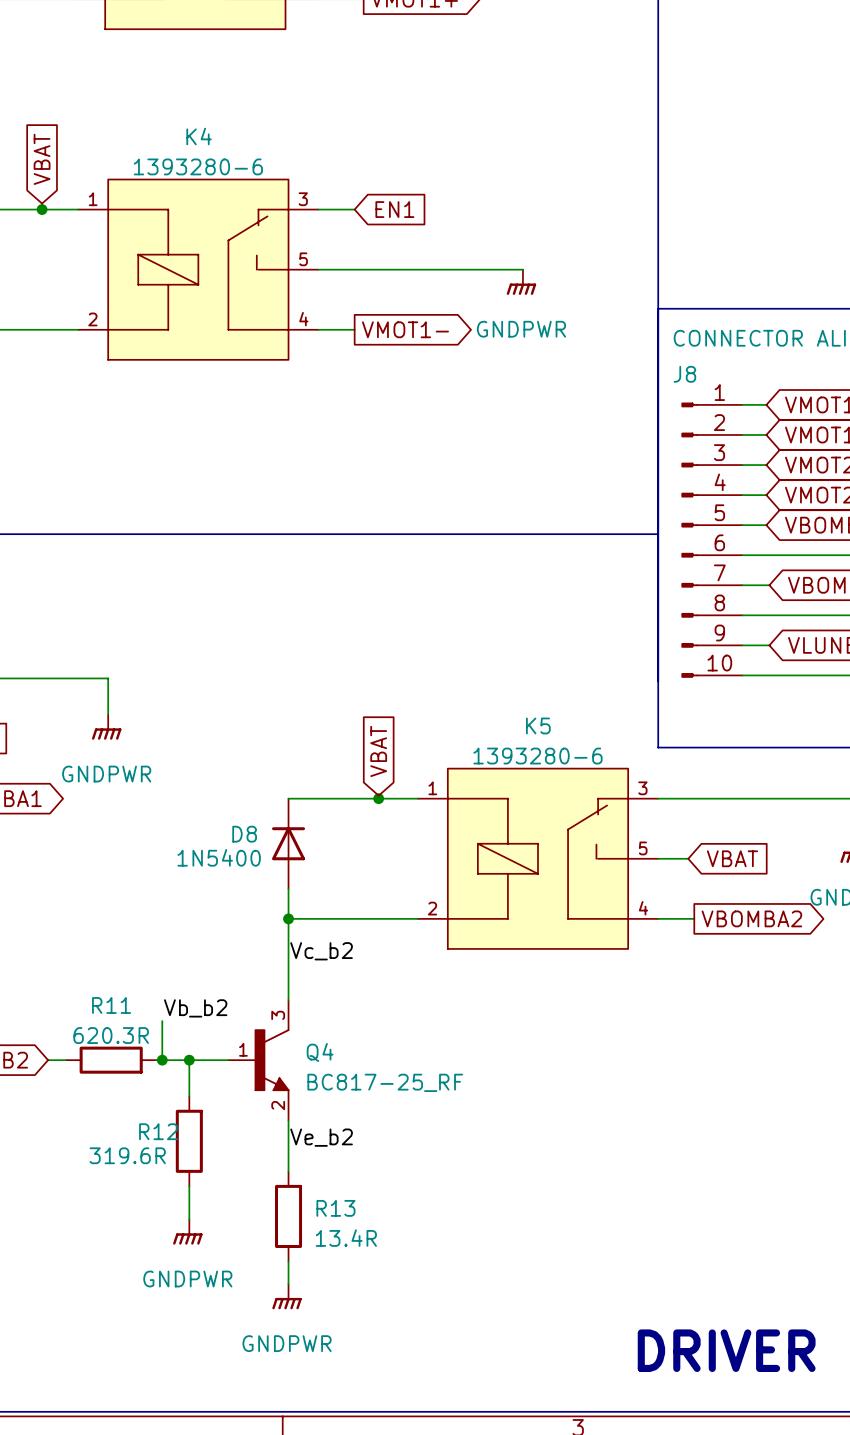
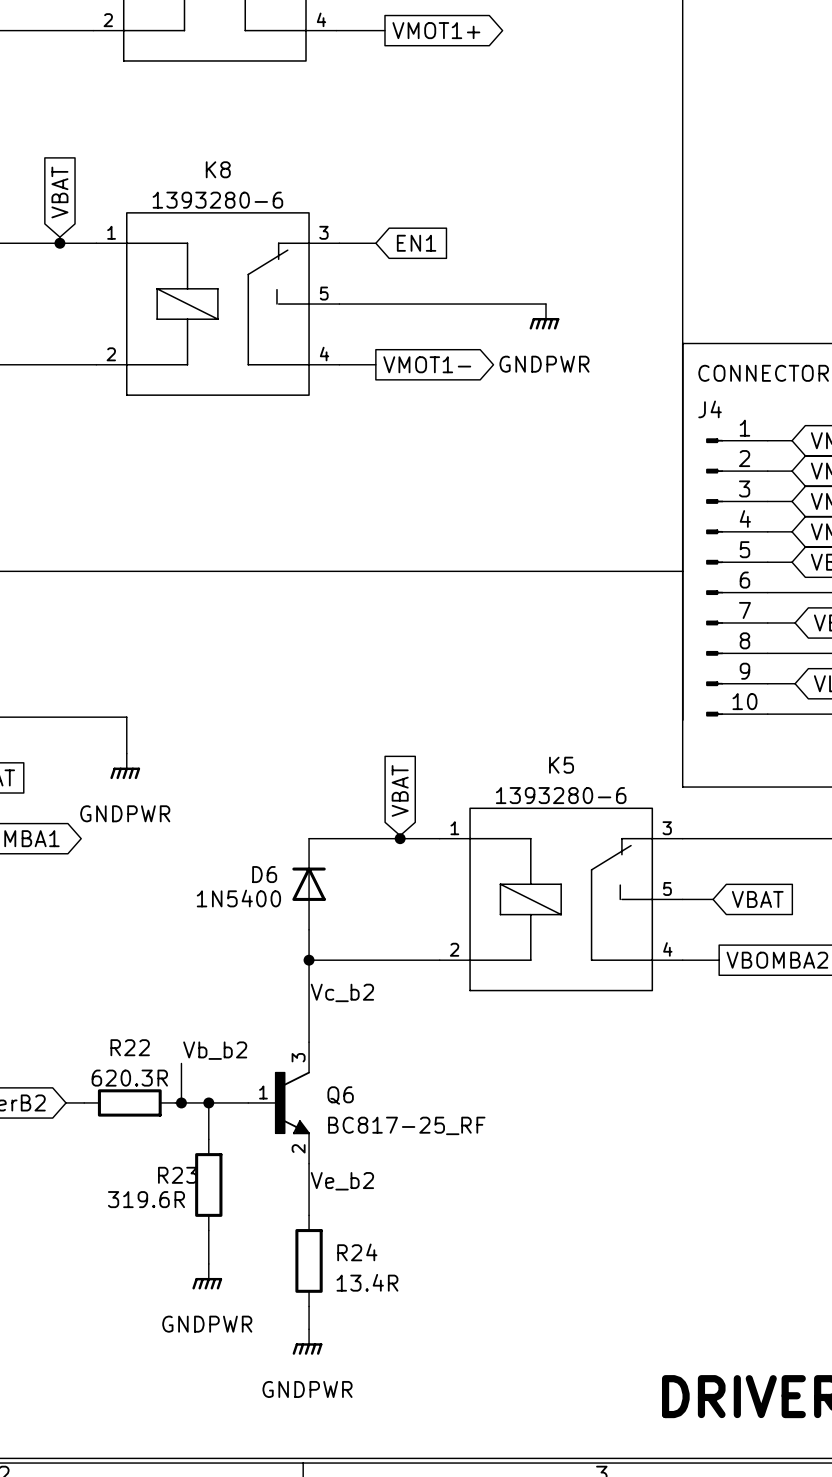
K4 name: K4 (199, 136) -> K8 (218, 169)
J8 name: J8 (684, 374) -> J4 (710, 409)
D8 name: D8 (244, 834) -> D6 (264, 874)
R11 name: R11 (111, 1005) -> R22 (130, 1047)
Q4 name: Q4 (320, 1052) -> Q6 (340, 1095)
R12 name: R12 (158, 1131) -> R23 (177, 1175)
R13 name: R13 (335, 1208) -> R24 (357, 1252)

